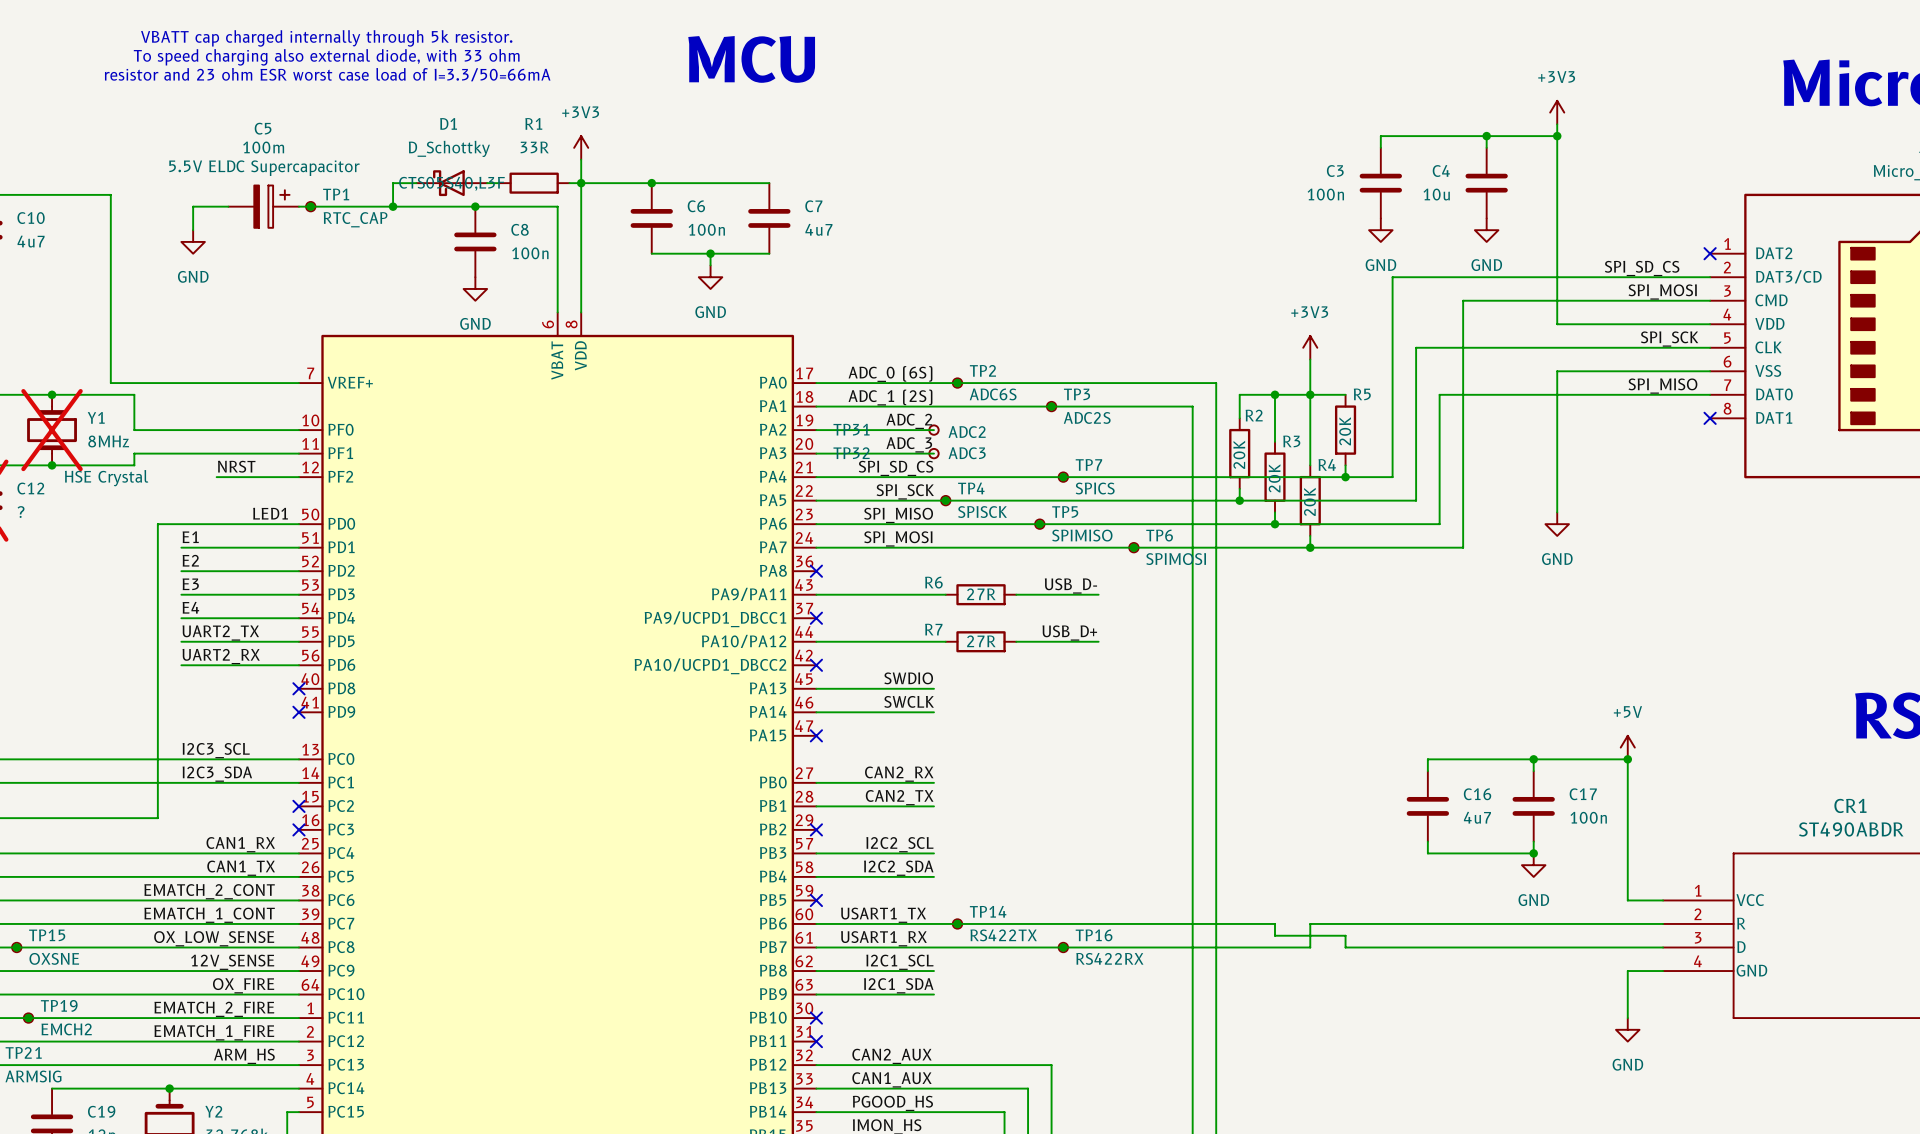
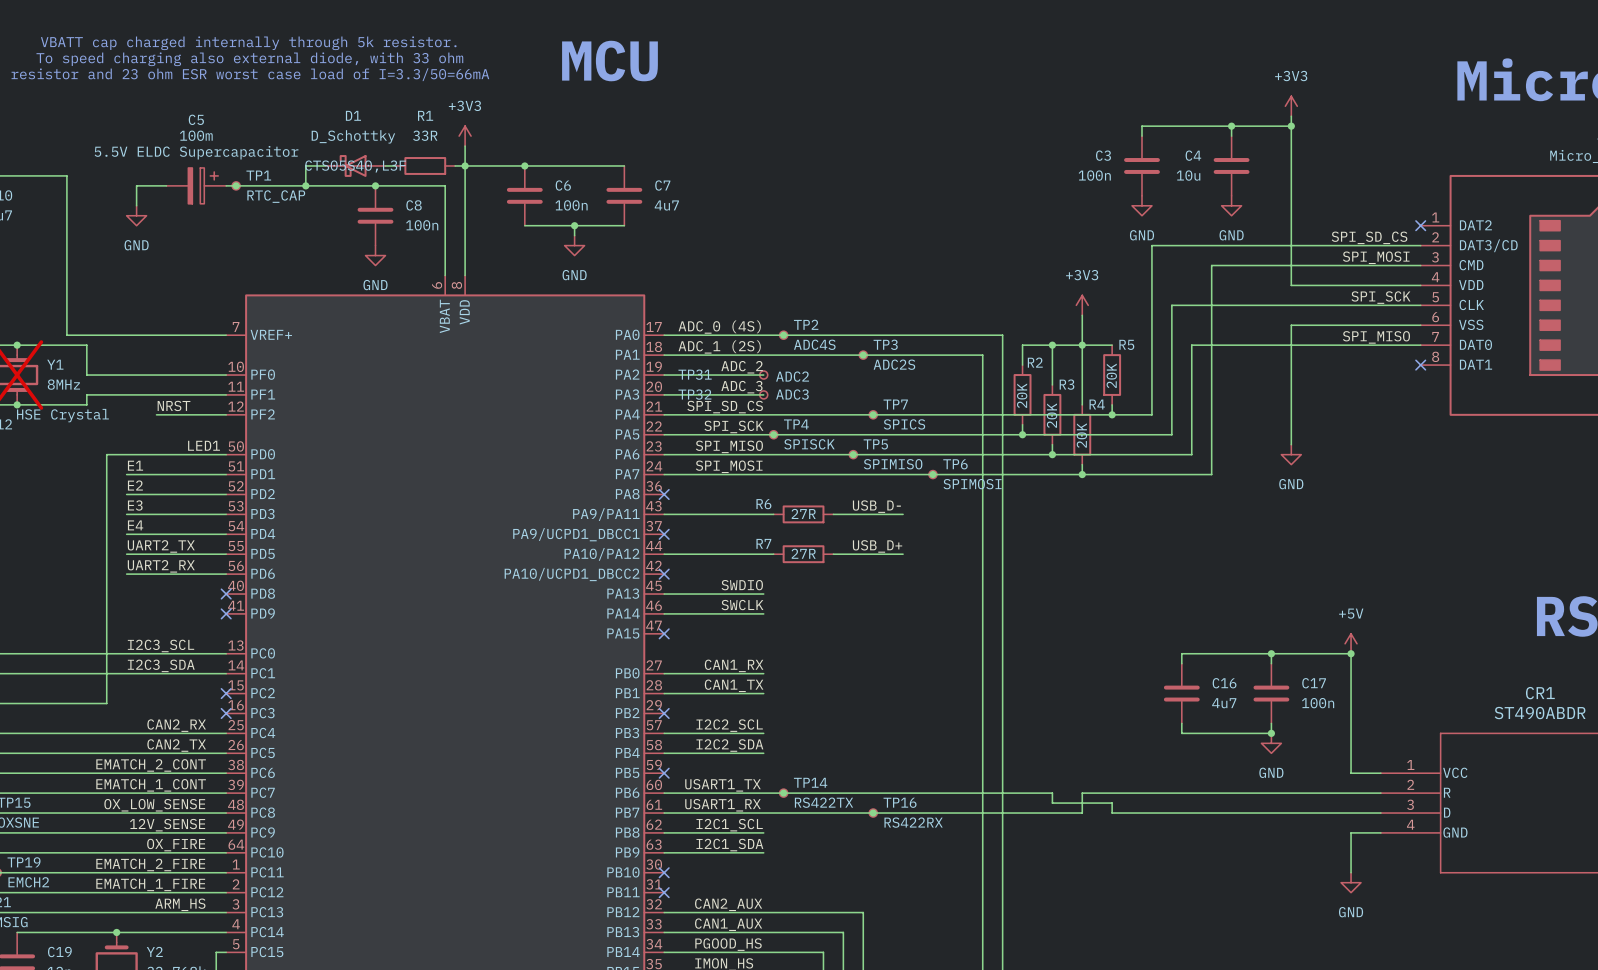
label: ADC_0 (6S) (890, 374) -> ADC_0 (4S) (719, 327)
TP2 value: ADC6S (993, 394) -> ADC4S (814, 344)
label: CAN2_RX (899, 774) -> CAN1_RX (734, 665)
label: CAN2_TX (899, 797) -> CAN1_TX (734, 685)
label: CAN1_RX (240, 844) -> CAN2_RX (176, 725)
label: CAN1_TX (241, 868) -> CAN2_TX (176, 745)

